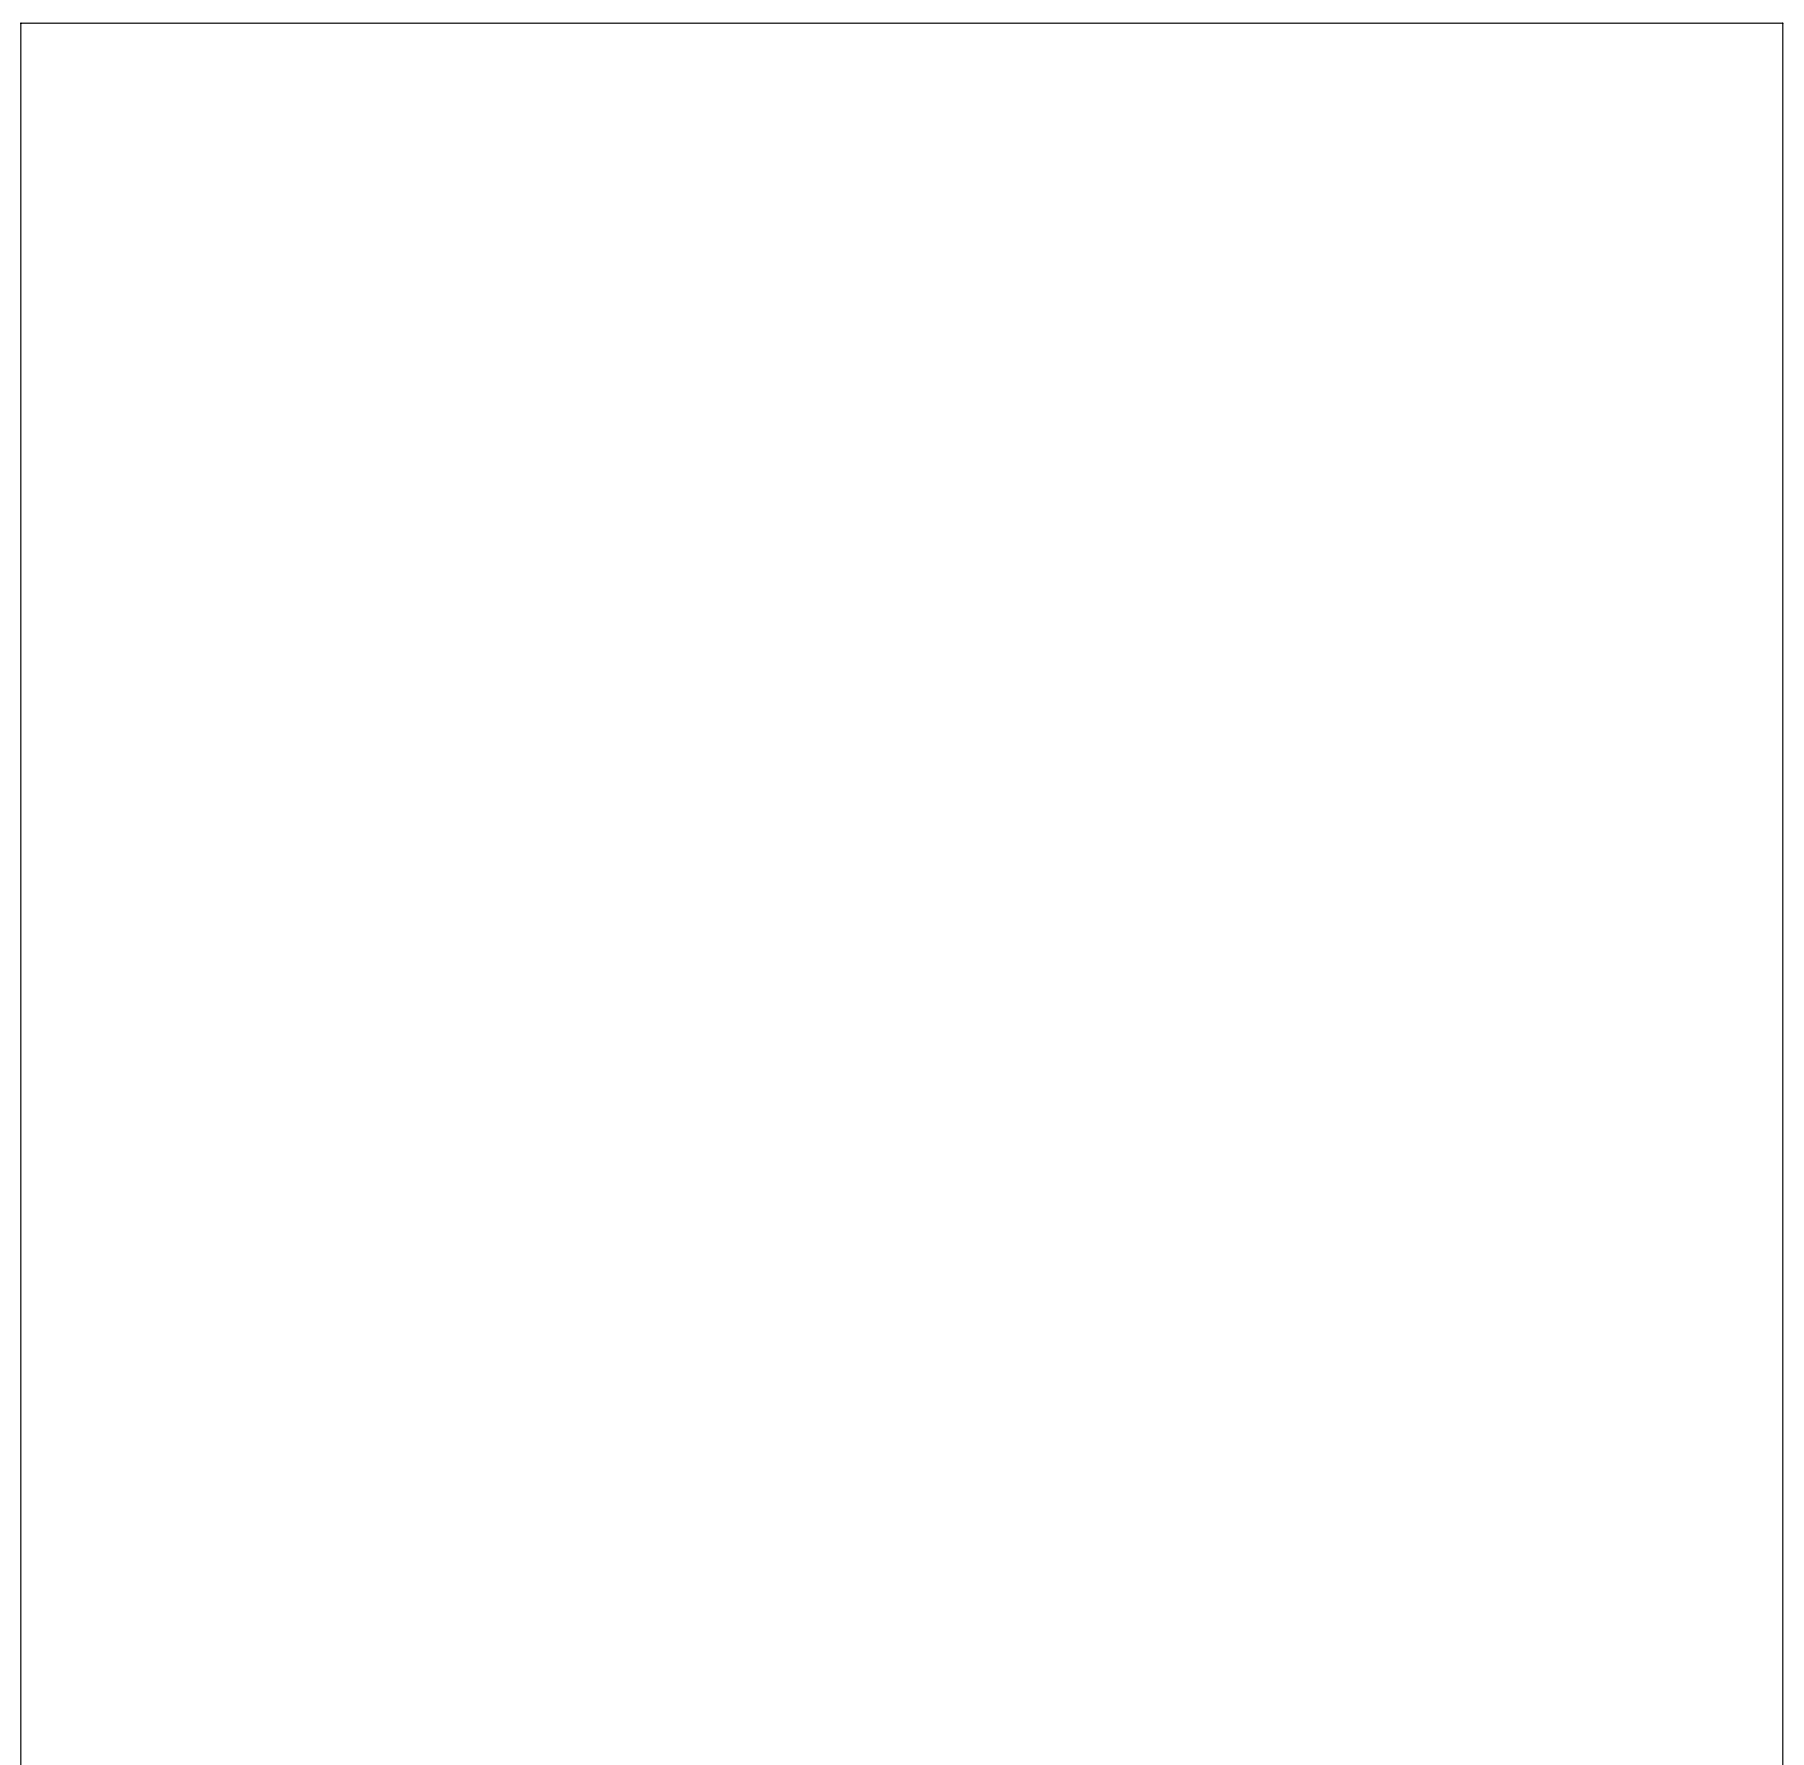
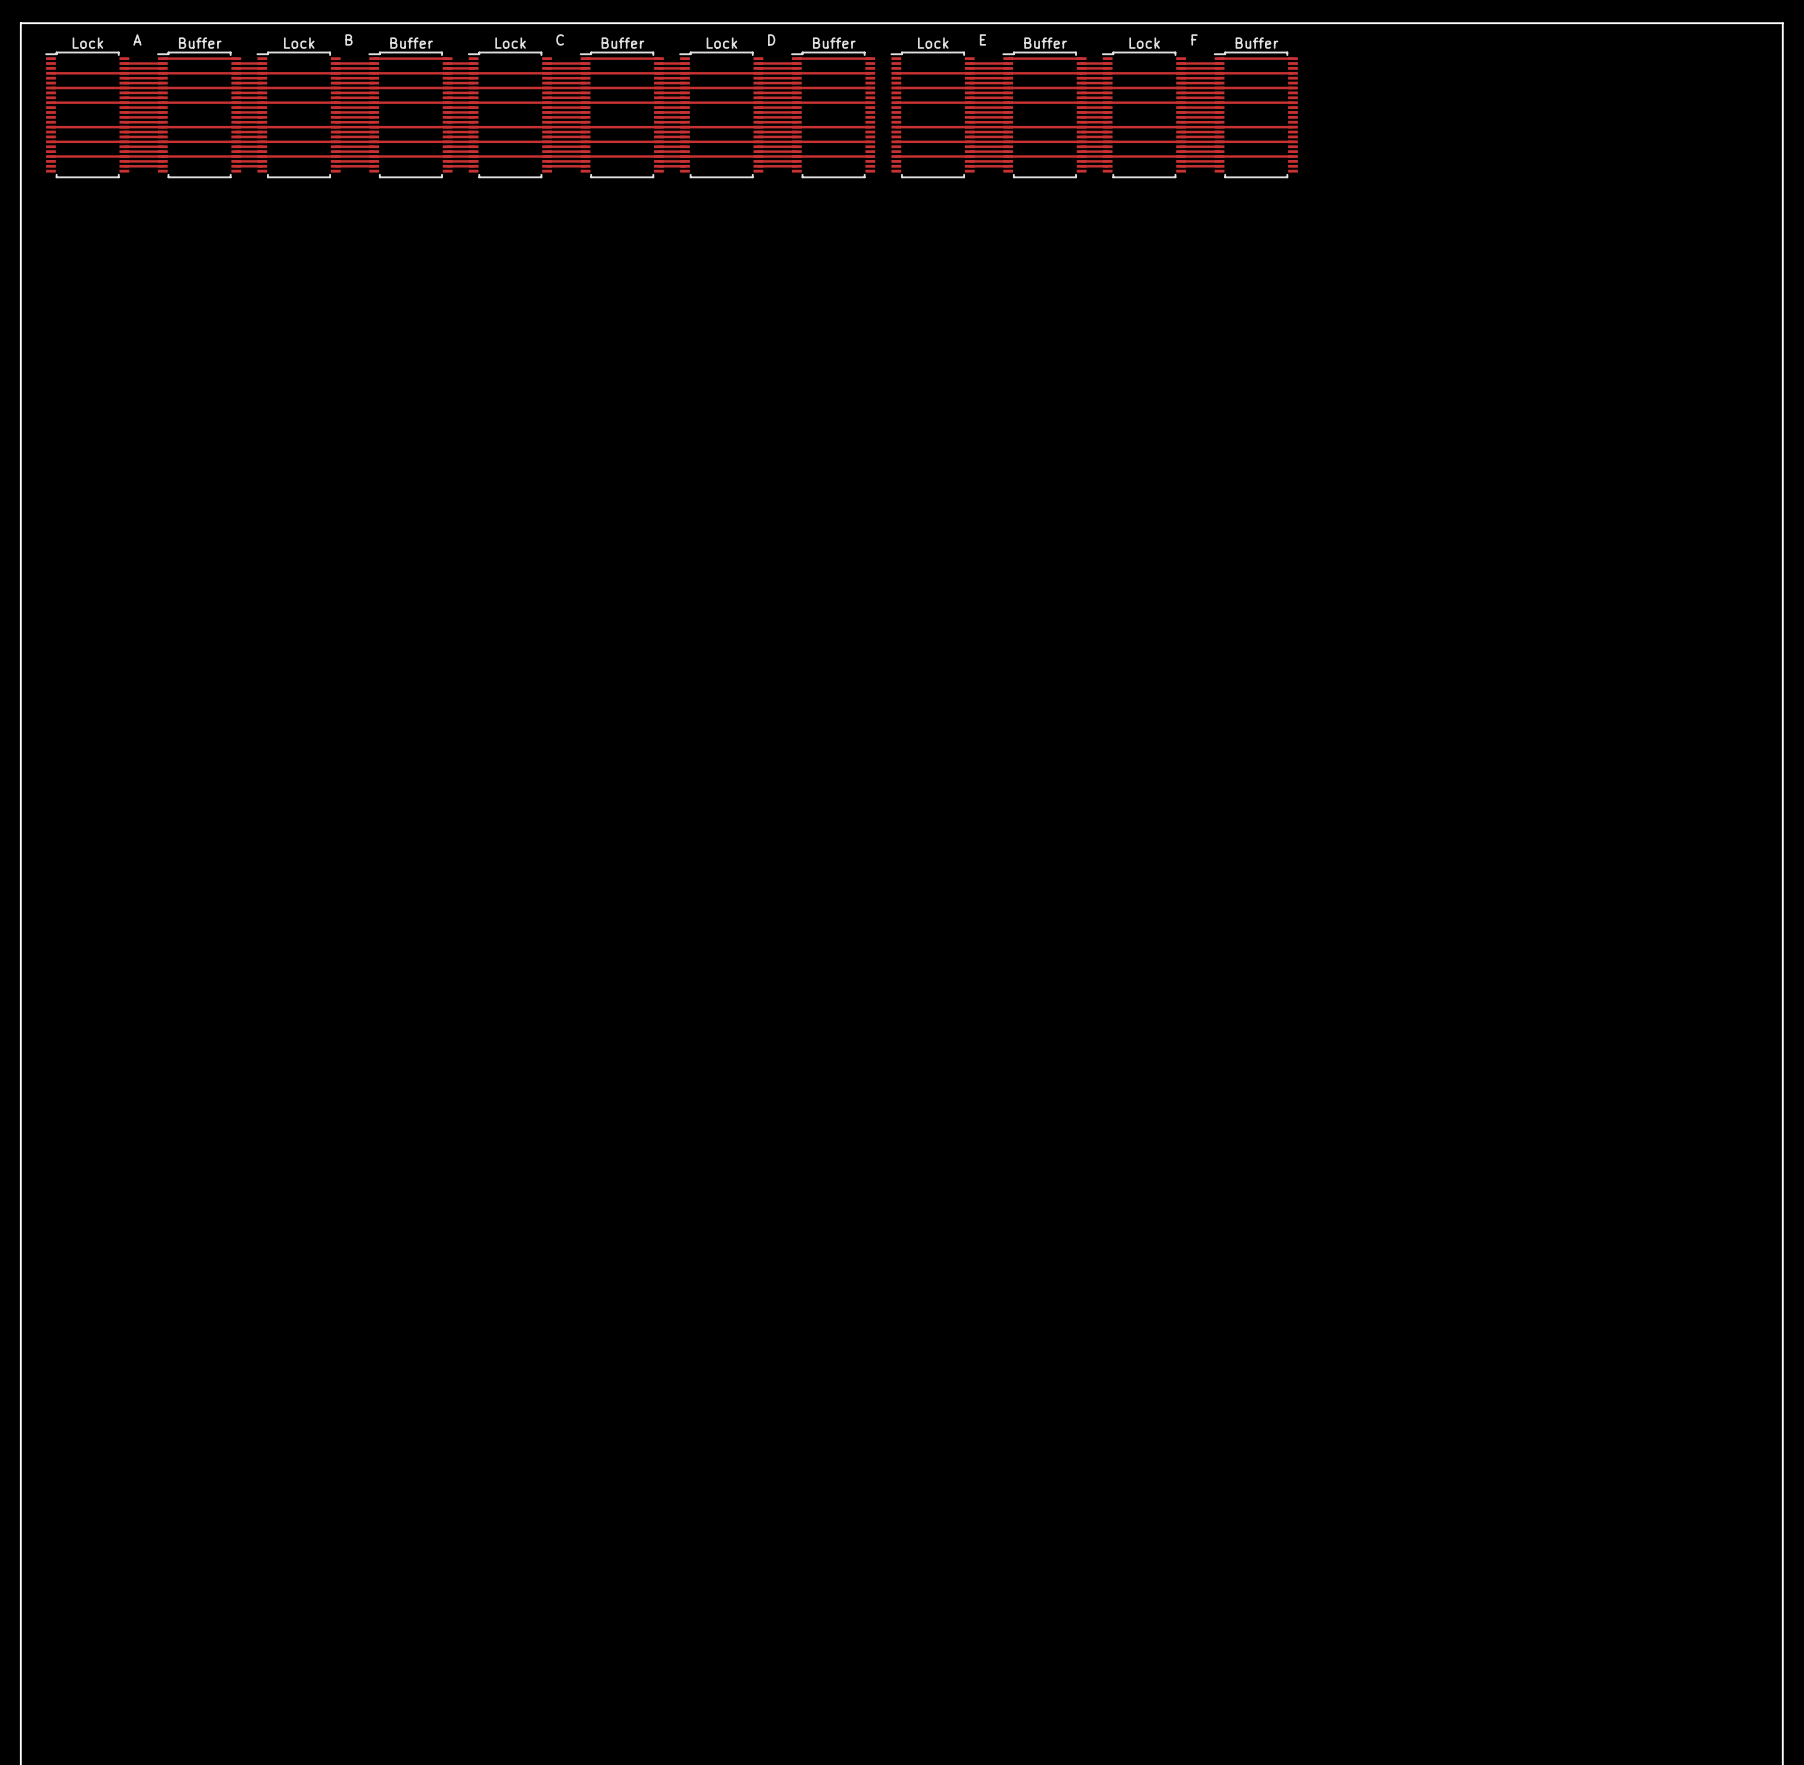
text: none -> A (137, 39)
text: none -> B (348, 39)
text: none -> C (560, 39)
text: none -> D (771, 39)
text: none -> E (983, 39)
text: none -> F (1194, 39)
top track: none -> (162, 58) (236, 58)
top track: none -> (374, 58) (447, 58)
top track: none -> (585, 58) (658, 58)
top track: none -> (796, 58) (870, 58)
top track: none -> (1008, 58) (1081, 58)
top track: none -> (1219, 58) (1292, 58)
top track: none -> (124, 63) (162, 63)
top track: none -> (236, 63) (262, 63)
top track: none -> (335, 63) (374, 63)
top track: none -> (447, 63) (473, 63)
top track: none -> (547, 63) (585, 63)
top track: none -> (658, 63) (684, 63)
top track: none -> (758, 63) (796, 63)
top track: none -> (969, 63) (1008, 63)
top track: none -> (1081, 63) (1107, 63)
top track: none -> (1181, 63) (1219, 63)
top track: none -> (124, 68) (162, 68)
top track: none -> (236, 68) (262, 68)
top track: none -> (335, 68) (374, 68)
top track: none -> (447, 68) (473, 68)
top track: none -> (547, 68) (585, 68)
top track: none -> (658, 68) (684, 68)
top track: none -> (758, 68) (796, 68)
top track: none -> (969, 68) (1008, 68)
top track: none -> (1081, 68) (1107, 68)
top track: none -> (1181, 68) (1219, 68)
top track: none -> (50, 73) (870, 73)
top track: none -> (896, 73) (1292, 73)
top track: none -> (124, 78) (162, 78)
top track: none -> (236, 78) (262, 78)
top track: none -> (335, 78) (374, 78)
top track: none -> (447, 78) (473, 78)
top track: none -> (547, 78) (585, 78)
top track: none -> (658, 78) (684, 78)
top track: none -> (758, 78) (796, 78)
top track: none -> (969, 78) (1008, 78)
top track: none -> (1081, 78) (1107, 78)
top track: none -> (1181, 78) (1219, 78)
top track: none -> (124, 83) (162, 83)
top track: none -> (236, 83) (262, 83)
top track: none -> (335, 83) (374, 83)
top track: none -> (447, 83) (473, 83)
top track: none -> (547, 83) (585, 83)
top track: none -> (658, 83) (684, 83)
top track: none -> (758, 83) (796, 83)
top track: none -> (969, 83) (1008, 83)
top track: none -> (1081, 83) (1107, 83)
top track: none -> (1181, 83) (1219, 83)
top track: none -> (50, 87) (870, 87)
top track: none -> (896, 87) (1292, 87)
top track: none -> (124, 92) (162, 92)
top track: none -> (236, 92) (262, 92)
top track: none -> (335, 92) (374, 92)
top track: none -> (447, 92) (473, 92)
top track: none -> (547, 92) (585, 92)
top track: none -> (658, 92) (684, 92)
top track: none -> (758, 92) (796, 92)
top track: none -> (969, 92) (1008, 92)
top track: none -> (1081, 92) (1107, 92)
top track: none -> (1181, 92) (1219, 92)
top track: none -> (124, 97) (162, 97)
top track: none -> (236, 97) (262, 97)
top track: none -> (335, 97) (374, 97)
top track: none -> (447, 97) (473, 97)
top track: none -> (547, 97) (585, 97)
top track: none -> (658, 97) (684, 97)
top track: none -> (758, 97) (796, 97)
top track: none -> (969, 97) (1008, 97)
top track: none -> (1081, 97) (1107, 97)
top track: none -> (1181, 97) (1219, 97)
top track: none -> (50, 102) (870, 102)
top track: none -> (896, 102) (1292, 102)
top track: none -> (124, 107) (162, 107)
top track: none -> (236, 107) (262, 107)
top track: none -> (335, 107) (374, 107)
top track: none -> (447, 107) (473, 107)
top track: none -> (547, 107) (585, 107)
top track: none -> (658, 107) (684, 107)
top track: none -> (758, 107) (796, 107)
top track: none -> (969, 107) (1008, 107)
top track: none -> (1081, 107) (1107, 107)
top track: none -> (1181, 107) (1219, 107)
top track: none -> (124, 112) (162, 112)
top track: none -> (236, 112) (262, 112)
top track: none -> (335, 112) (374, 112)
top track: none -> (447, 112) (473, 112)
top track: none -> (547, 112) (585, 112)
top track: none -> (658, 112) (684, 112)
top track: none -> (758, 112) (796, 112)
top track: none -> (969, 112) (1008, 112)
top track: none -> (1081, 112) (1107, 112)
top track: none -> (1181, 112) (1219, 112)
Lock: none -> (87, 114)
Buffer: none -> (199, 114)
Lock: none -> (298, 114)
Buffer: none -> (410, 114)
Lock: none -> (509, 114)
Buffer: none -> (621, 114)
Lock: none -> (721, 114)
Buffer: none -> (833, 114)
Lock: none -> (932, 114)
Buffer: none -> (1044, 114)
Lock: none -> (1144, 114)
Buffer: none -> (1255, 114)
top track: none -> (124, 117) (162, 117)
top track: none -> (236, 117) (262, 117)
top track: none -> (335, 117) (374, 117)
top track: none -> (447, 117) (473, 117)
top track: none -> (547, 117) (585, 117)
top track: none -> (658, 117) (684, 117)
top track: none -> (758, 117) (796, 117)
top track: none -> (969, 117) (1008, 117)
top track: none -> (1081, 117) (1107, 117)
top track: none -> (1181, 117) (1219, 117)
top track: none -> (124, 122) (162, 122)
top track: none -> (236, 122) (262, 122)
top track: none -> (335, 122) (374, 122)
top track: none -> (447, 122) (473, 122)
top track: none -> (547, 122) (585, 122)
top track: none -> (658, 122) (684, 122)
top track: none -> (758, 122) (796, 122)
top track: none -> (969, 122) (1008, 122)
top track: none -> (1081, 122) (1107, 122)
top track: none -> (1181, 122) (1219, 122)
top track: none -> (50, 127) (870, 127)
top track: none -> (896, 127) (1292, 127)
top track: none -> (124, 132) (162, 132)
top track: none -> (236, 132) (262, 132)
top track: none -> (335, 132) (374, 132)
top track: none -> (447, 132) (473, 132)
top track: none -> (547, 132) (585, 132)
top track: none -> (658, 132) (684, 132)
top track: none -> (758, 132) (796, 132)
top track: none -> (969, 132) (1008, 132)
top track: none -> (1081, 132) (1107, 132)
top track: none -> (1181, 132) (1219, 132)
top track: none -> (124, 136) (162, 136)
top track: none -> (236, 136) (262, 136)
top track: none -> (335, 136) (374, 136)
top track: none -> (447, 136) (473, 136)
top track: none -> (547, 136) (585, 136)
top track: none -> (658, 136) (684, 136)
top track: none -> (758, 136) (796, 136)
top track: none -> (969, 136) (1008, 136)
top track: none -> (1081, 136) (1107, 136)
top track: none -> (1181, 136) (1219, 136)
top track: none -> (50, 141) (870, 141)
top track: none -> (896, 141) (1292, 141)
top track: none -> (124, 146) (162, 146)
top track: none -> (236, 146) (262, 146)
top track: none -> (335, 146) (374, 146)
top track: none -> (447, 146) (473, 146)
top track: none -> (547, 146) (585, 146)
top track: none -> (658, 146) (684, 146)
top track: none -> (758, 146) (796, 146)
top track: none -> (969, 146) (1008, 146)
top track: none -> (1081, 146) (1107, 146)
top track: none -> (1181, 146) (1219, 146)
top track: none -> (124, 151) (162, 151)
top track: none -> (236, 151) (262, 151)
top track: none -> (335, 151) (374, 151)
top track: none -> (447, 151) (473, 151)
top track: none -> (547, 151) (585, 151)
top track: none -> (658, 151) (684, 151)
top track: none -> (758, 151) (796, 151)
top track: none -> (969, 151) (1008, 151)
top track: none -> (1081, 151) (1107, 151)
top track: none -> (1181, 151) (1219, 151)
top track: none -> (50, 156) (870, 156)
top track: none -> (896, 156) (1292, 156)
top track: none -> (124, 161) (162, 161)
top track: none -> (236, 161) (262, 161)
top track: none -> (335, 161) (374, 161)
top track: none -> (447, 161) (473, 161)
top track: none -> (547, 161) (585, 161)
top track: none -> (658, 161) (684, 161)
top track: none -> (758, 161) (796, 161)
top track: none -> (969, 161) (1008, 161)
top track: none -> (1081, 161) (1107, 161)
top track: none -> (1181, 161) (1219, 161)
top track: none -> (124, 166) (162, 166)
top track: none -> (236, 166) (262, 166)
top track: none -> (335, 166) (374, 166)
top track: none -> (447, 166) (473, 166)
top track: none -> (547, 166) (585, 166)
top track: none -> (658, 166) (684, 166)
top track: none -> (758, 166) (796, 166)
top track: none -> (969, 166) (1008, 166)
top track: none -> (1081, 166) (1107, 166)
top track: none -> (1181, 166) (1219, 166)

